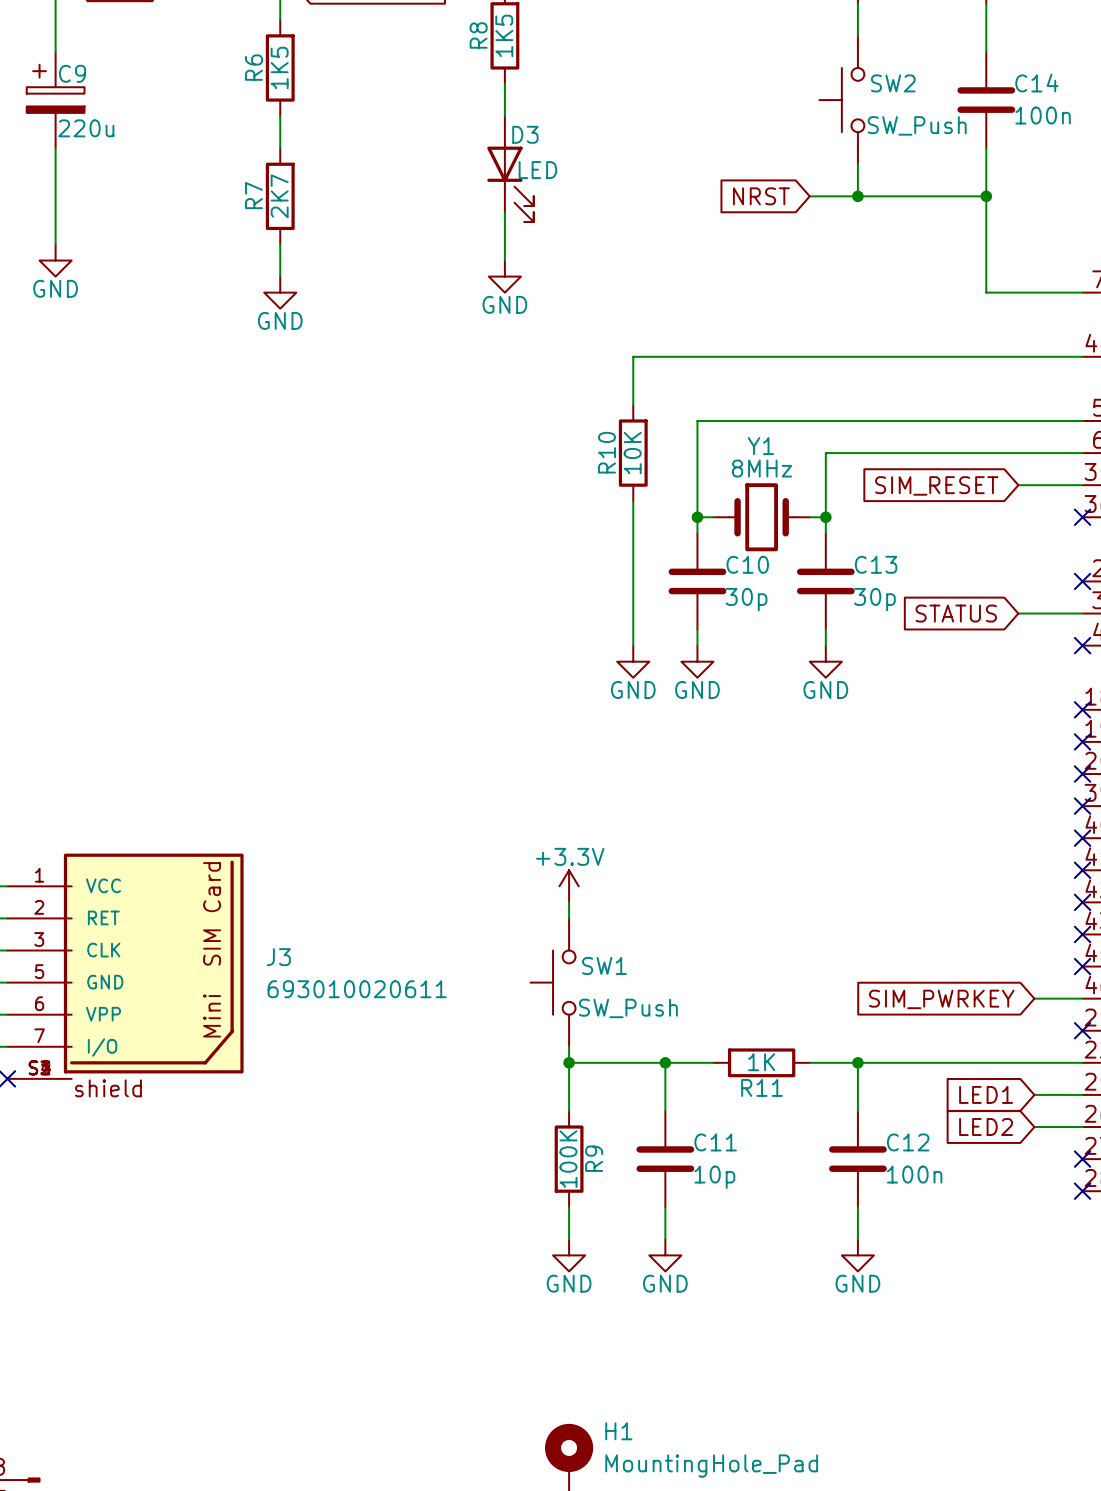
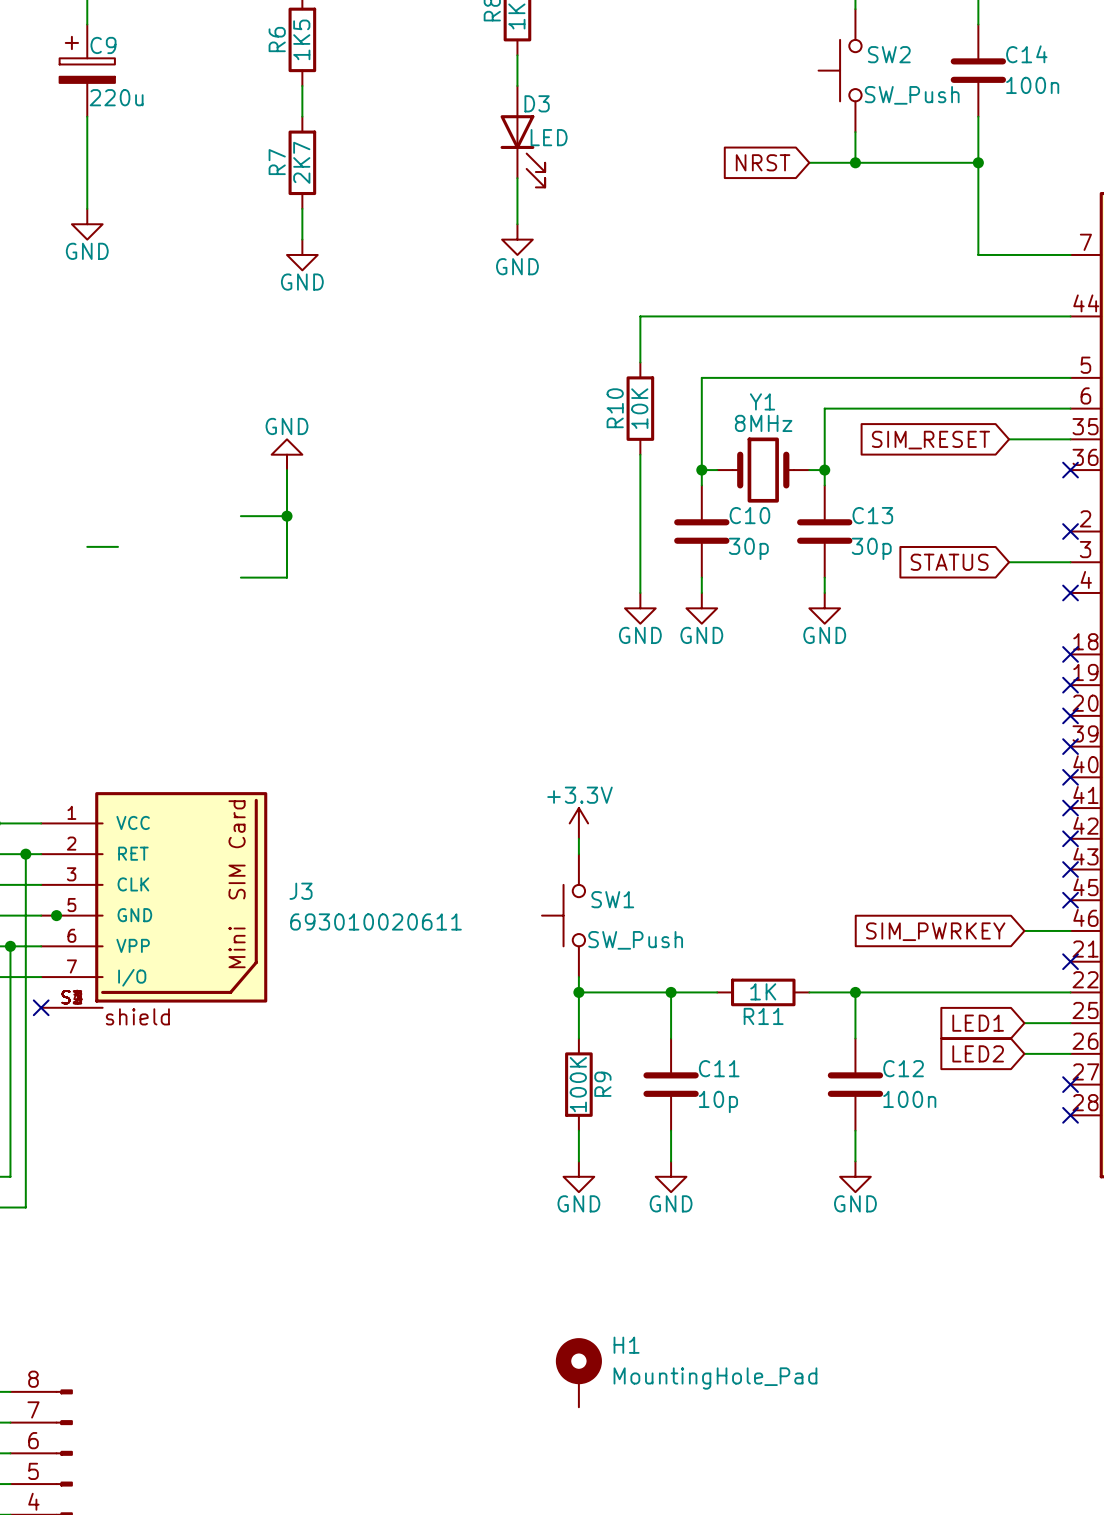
power symbol: none -> GND (287, 454)
wire: none -> (287, 470) (287, 577) (240, 577)
wire: none -> (240, 516) (287, 516)
junction: none -> (287, 516)
wire: none -> (87, 546) (118, 546)
junction: none -> (56, 915)

